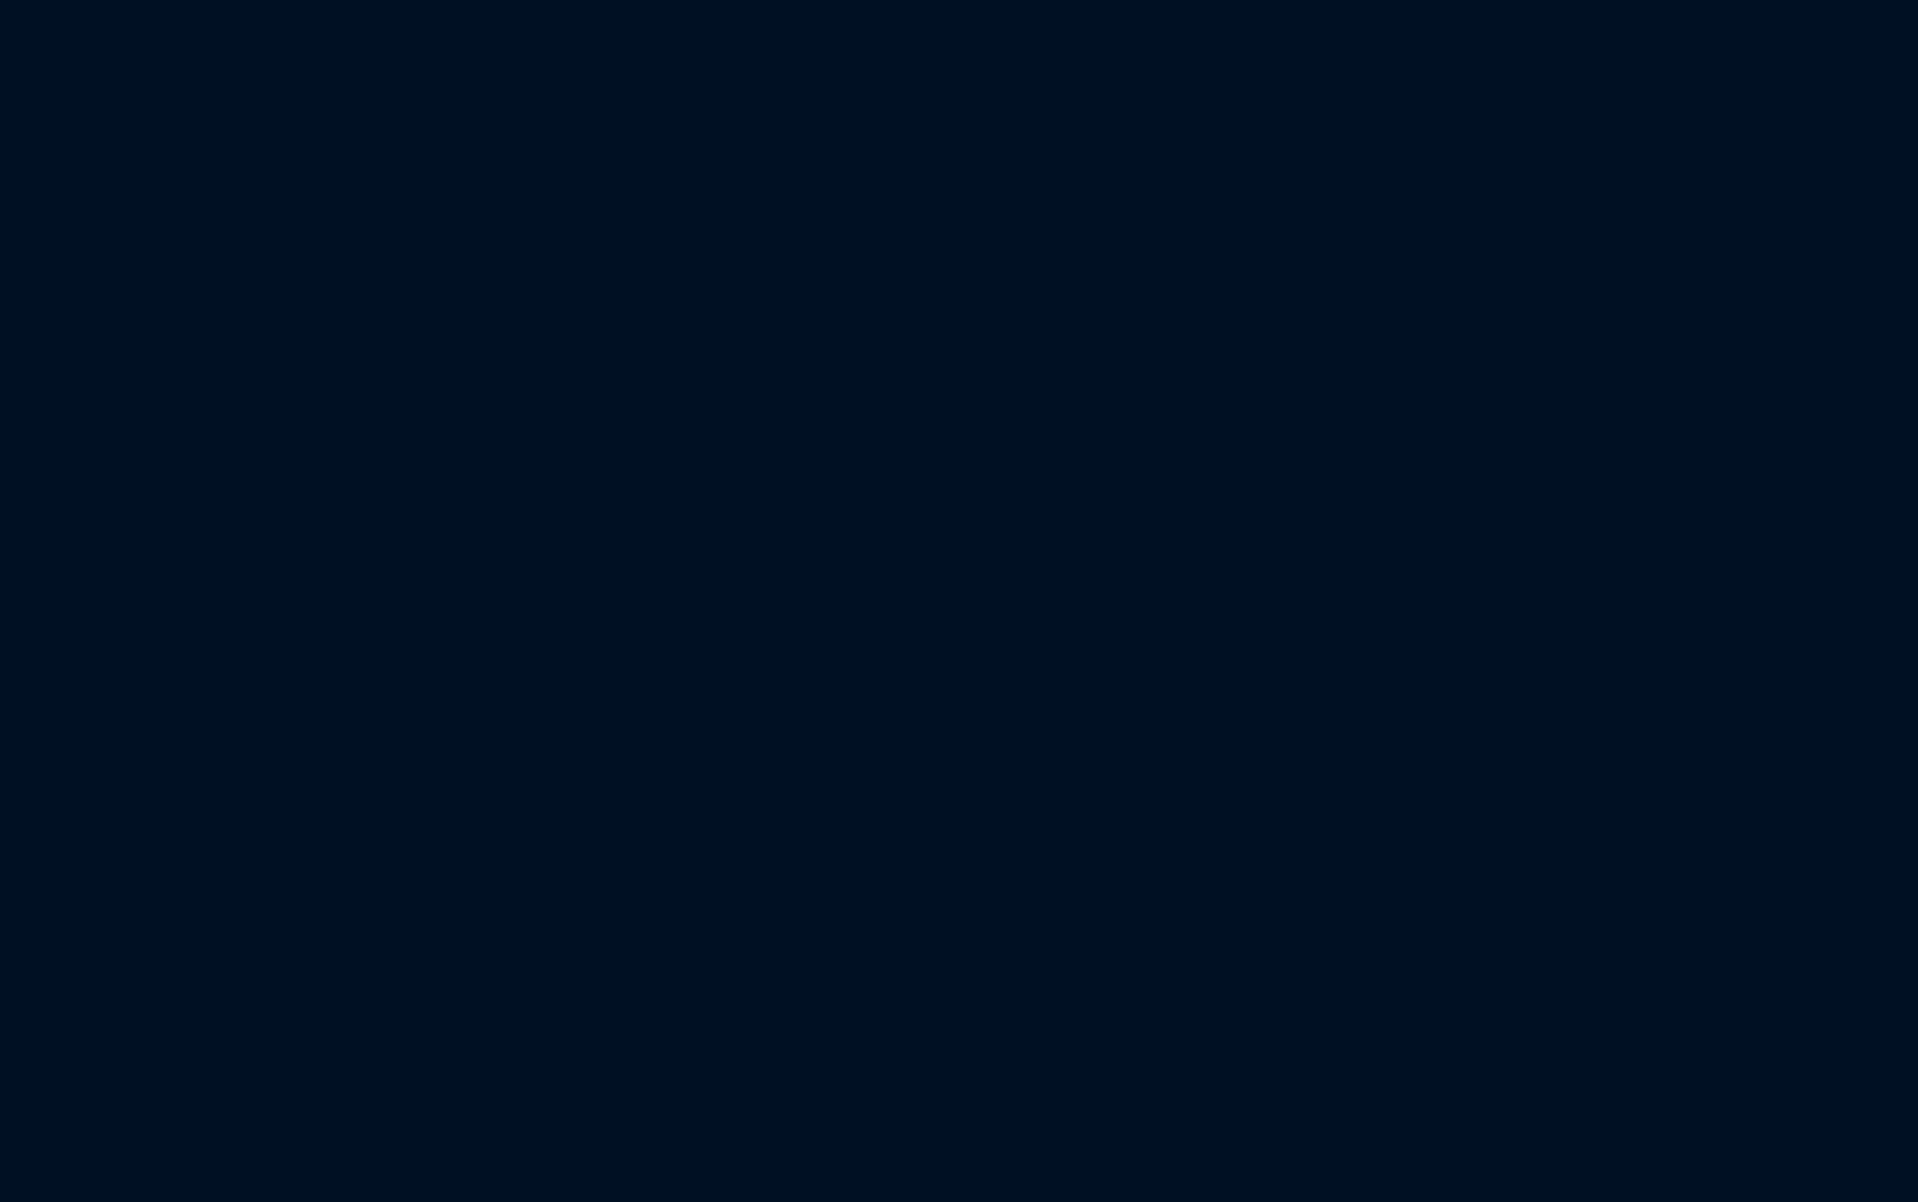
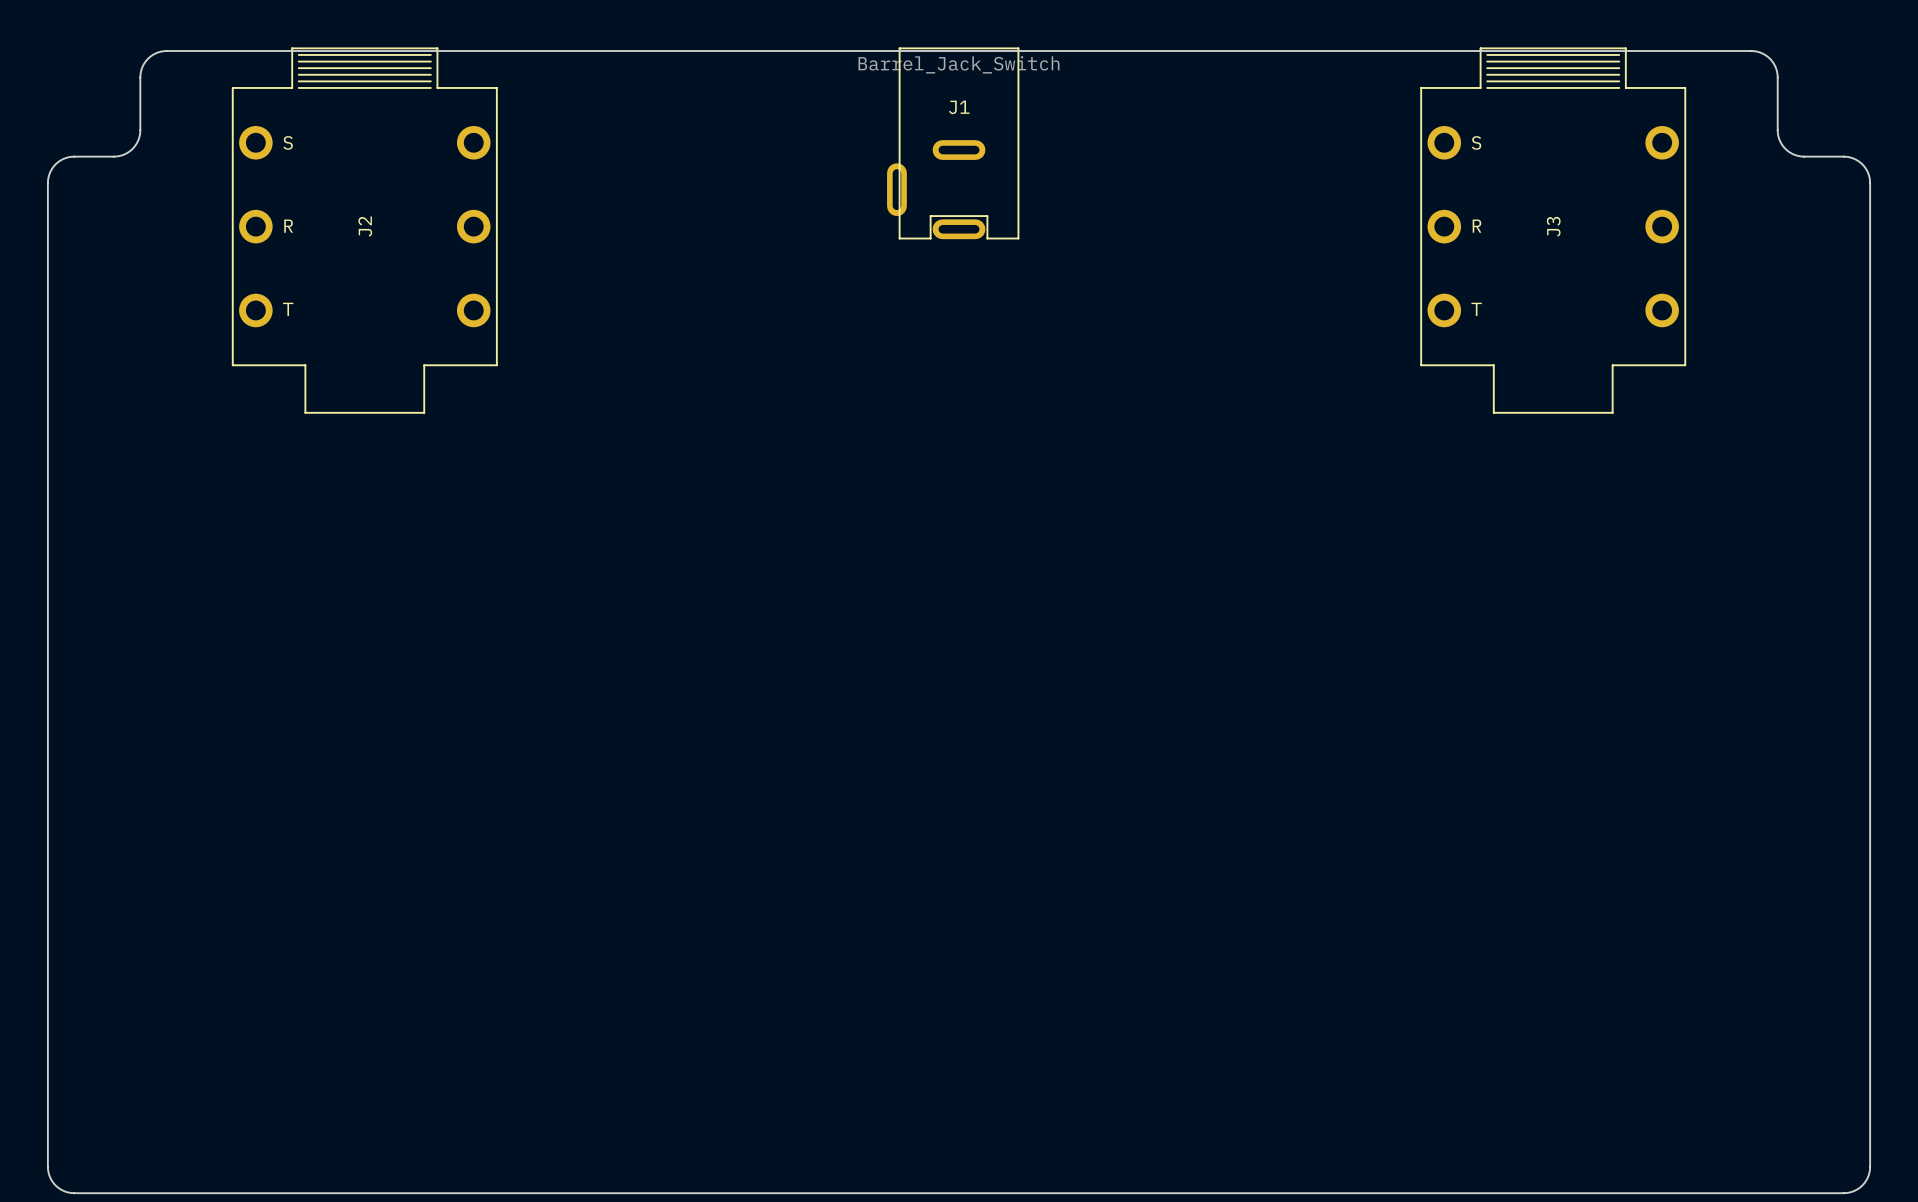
board edge: none -> (166, 51) (1751, 51) (1765, 55) (1771, 60) (1777, 71) (1777, 133) (1783, 146) (1792, 154) (1801, 156) (1852, 158) (1864, 166) (1869, 180) (1870, 1166) (1866, 1180) (1857, 1189) (1843, 1193) (74, 1193) (60, 1189) (50, 1178) (47, 1166) (48, 180) (53, 166) (65, 158) (116, 156) (132, 148) (140, 133) (141, 68) (150, 56) (166, 51)
J1: none -> Barrel_Jack_Switch (953, 143)
J2: none -> (364, 230)
J3: none -> (1553, 230)

